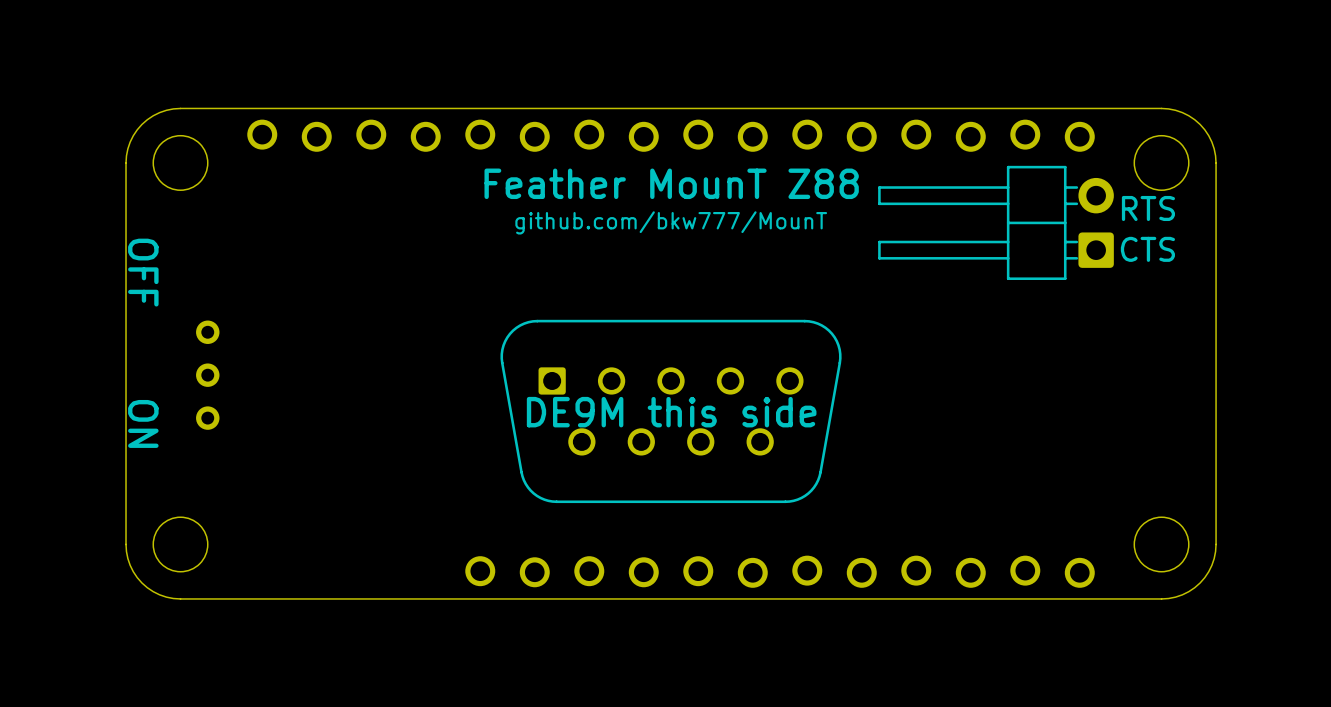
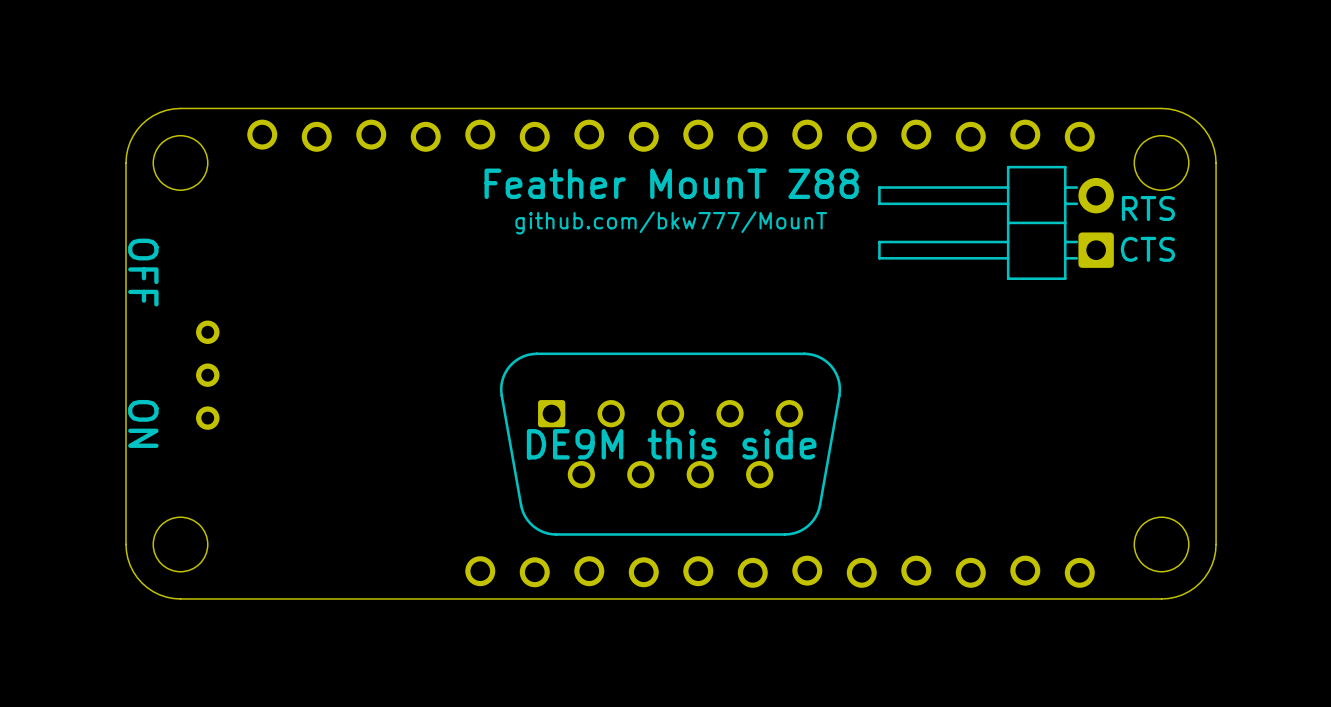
part position: (671, 411) -> (670, 444)
text position: DE9M this side (671, 412) -> DE9M this side (671, 444)

